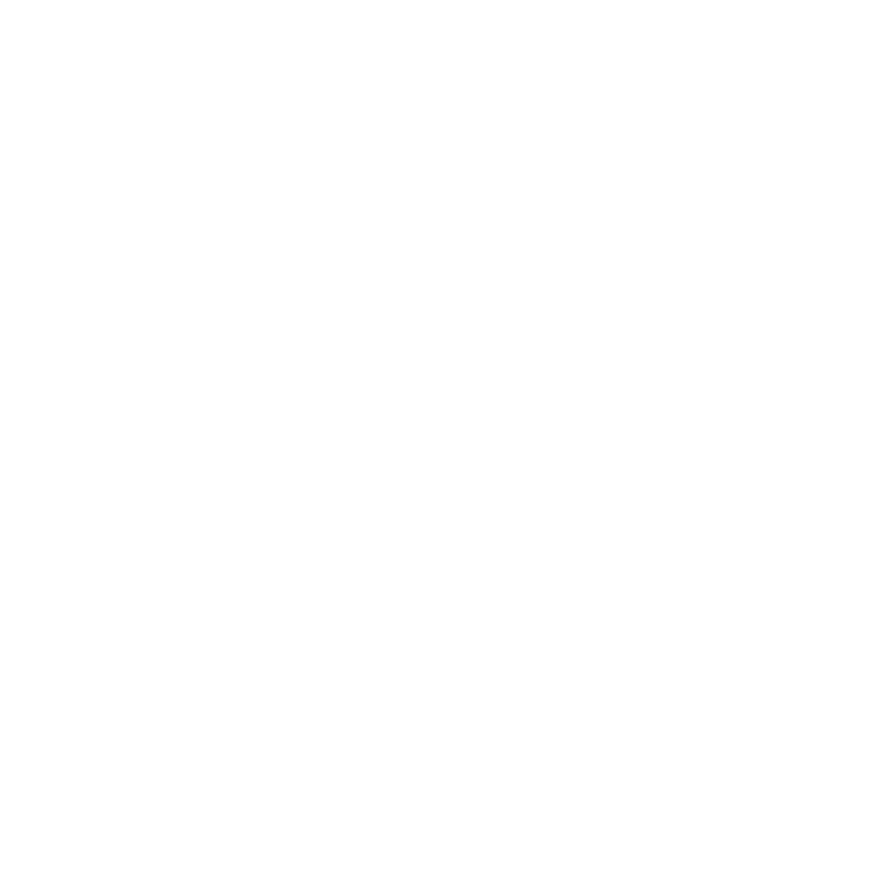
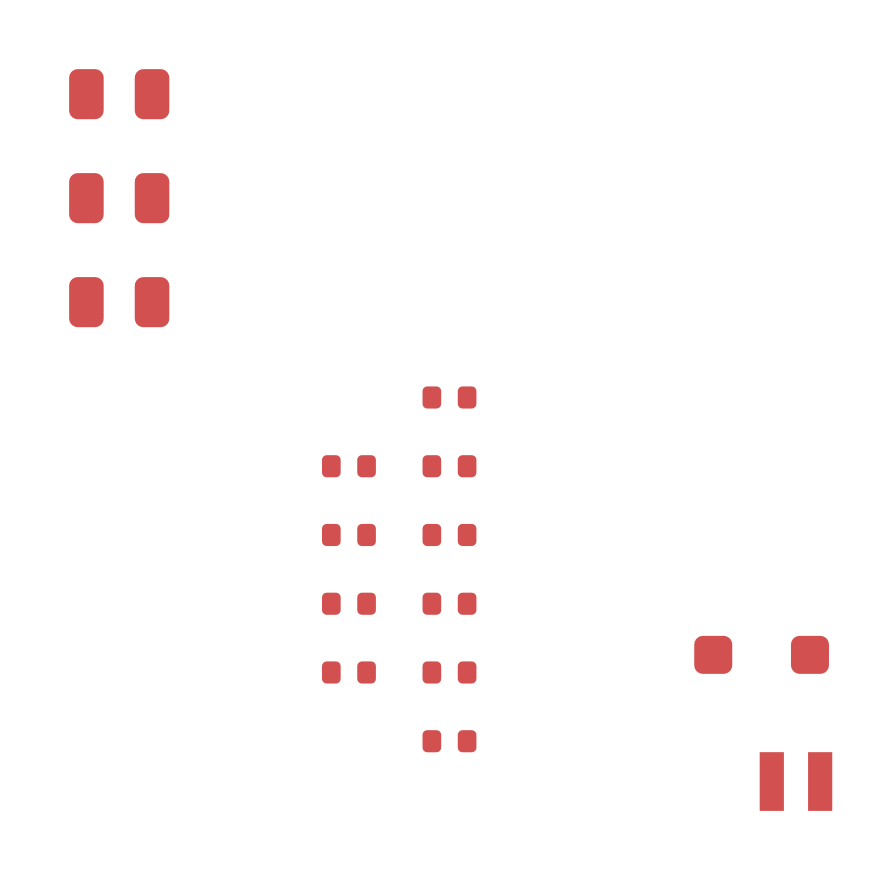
part: none -> (119, 94)
part: none -> (119, 198)
part: none -> (119, 302)
part: none -> (449, 397)
part: none -> (348, 466)
part: none -> (449, 466)
part: none -> (348, 534)
part: none -> (449, 534)
part: none -> (348, 603)
part: none -> (449, 603)
part: none -> (761, 654)
part: none -> (348, 672)
part: none -> (449, 672)
part: none -> (449, 741)
part: none -> (795, 781)

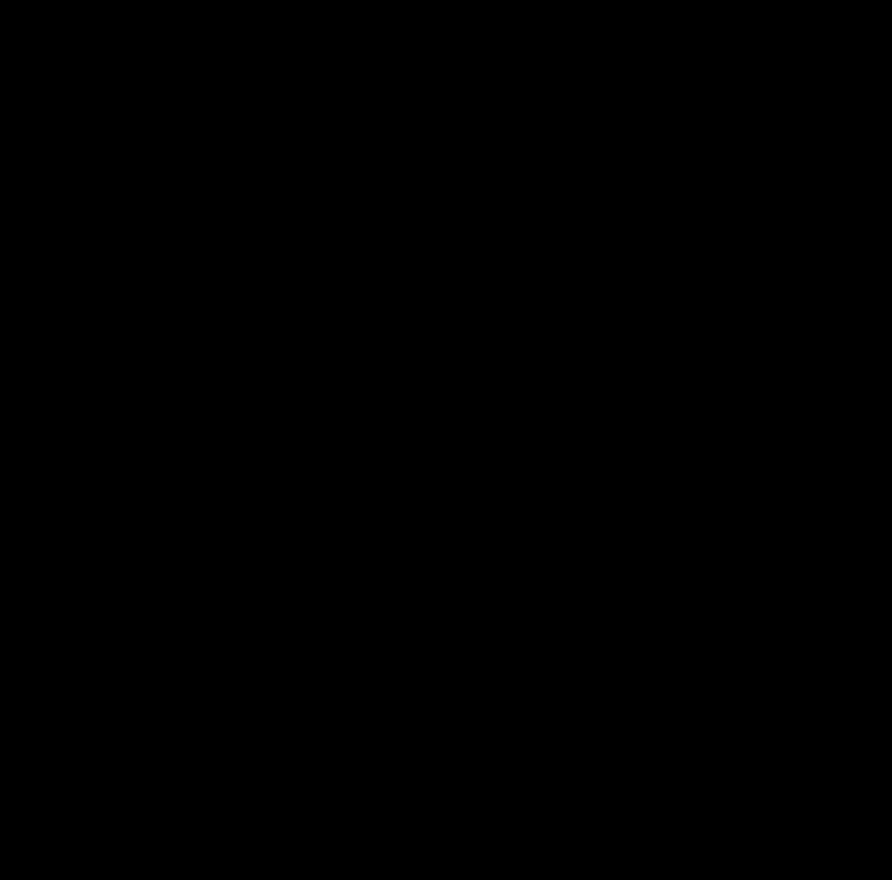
part: (119, 94) -> none
part: (119, 198) -> none
part: (119, 302) -> none
part: (449, 397) -> none
part: (348, 466) -> none
part: (449, 466) -> none
part: (348, 534) -> none
part: (449, 534) -> none
part: (348, 603) -> none
part: (449, 603) -> none
part: (761, 654) -> none
part: (348, 672) -> none
part: (449, 672) -> none
part: (449, 741) -> none
part: (795, 781) -> none

